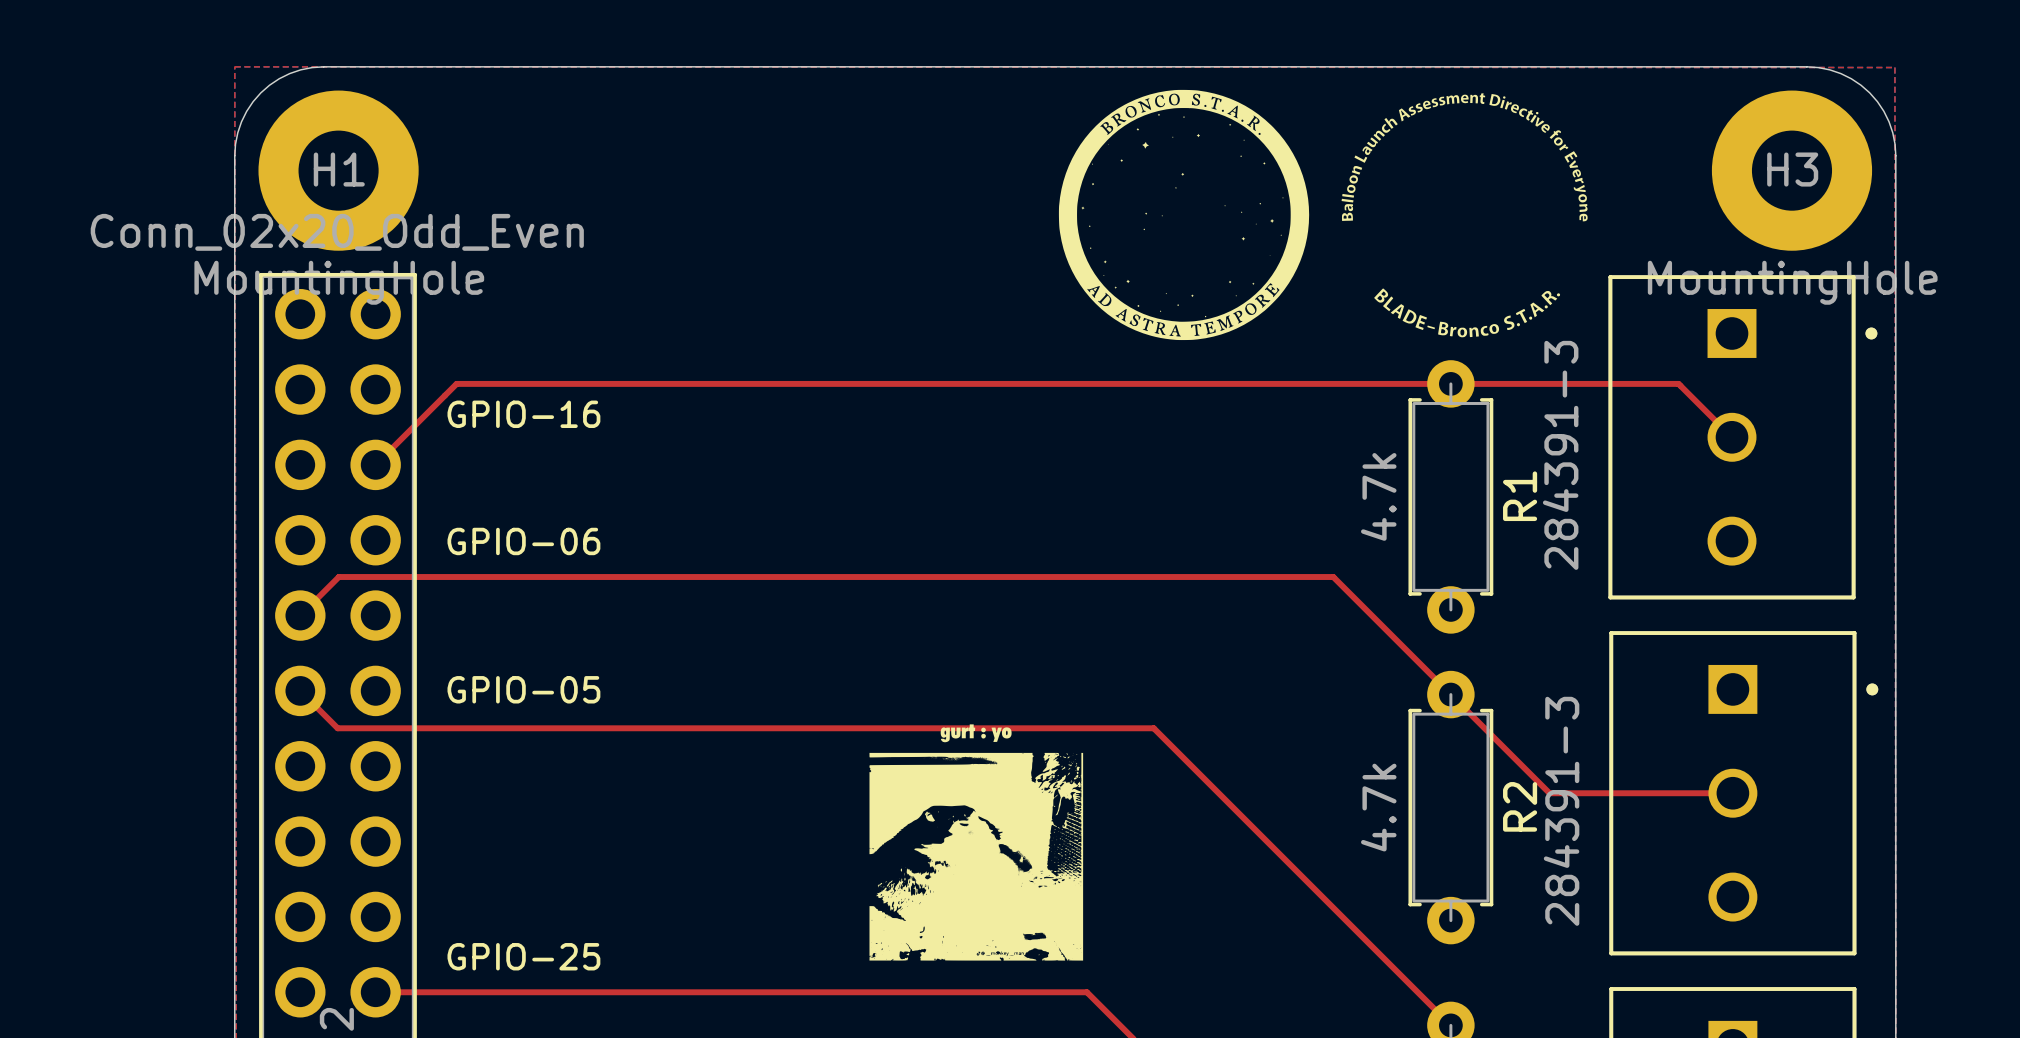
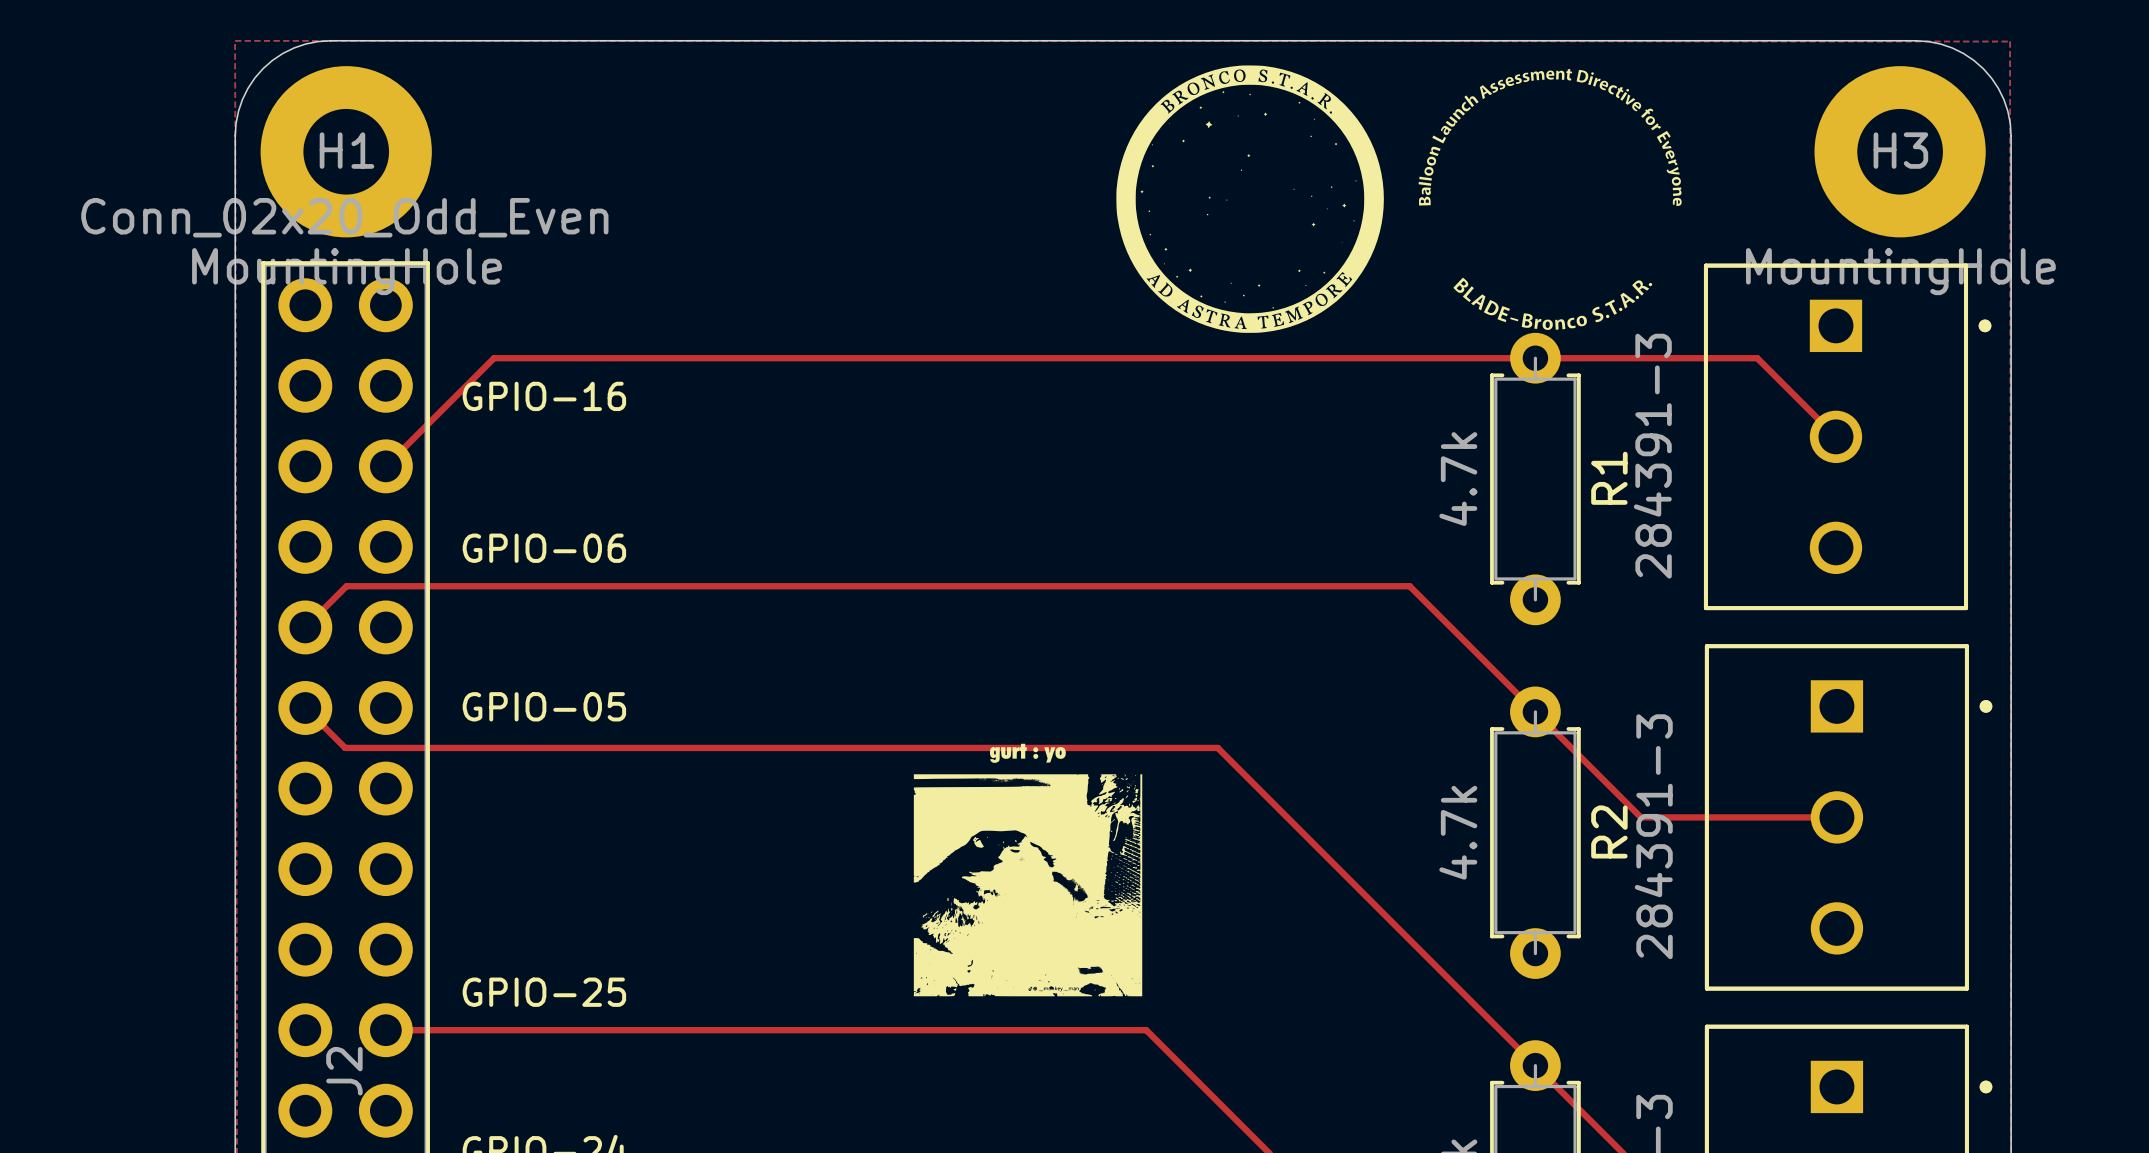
top track: (456, 383) (1678, 383) -> (472, 379) (494, 358) (1757, 358) (1778, 379)
text position: GPIO-16 (523, 414) -> GPIO-16 (544, 396)
R1 position: (1450, 496) -> (1535, 479)

